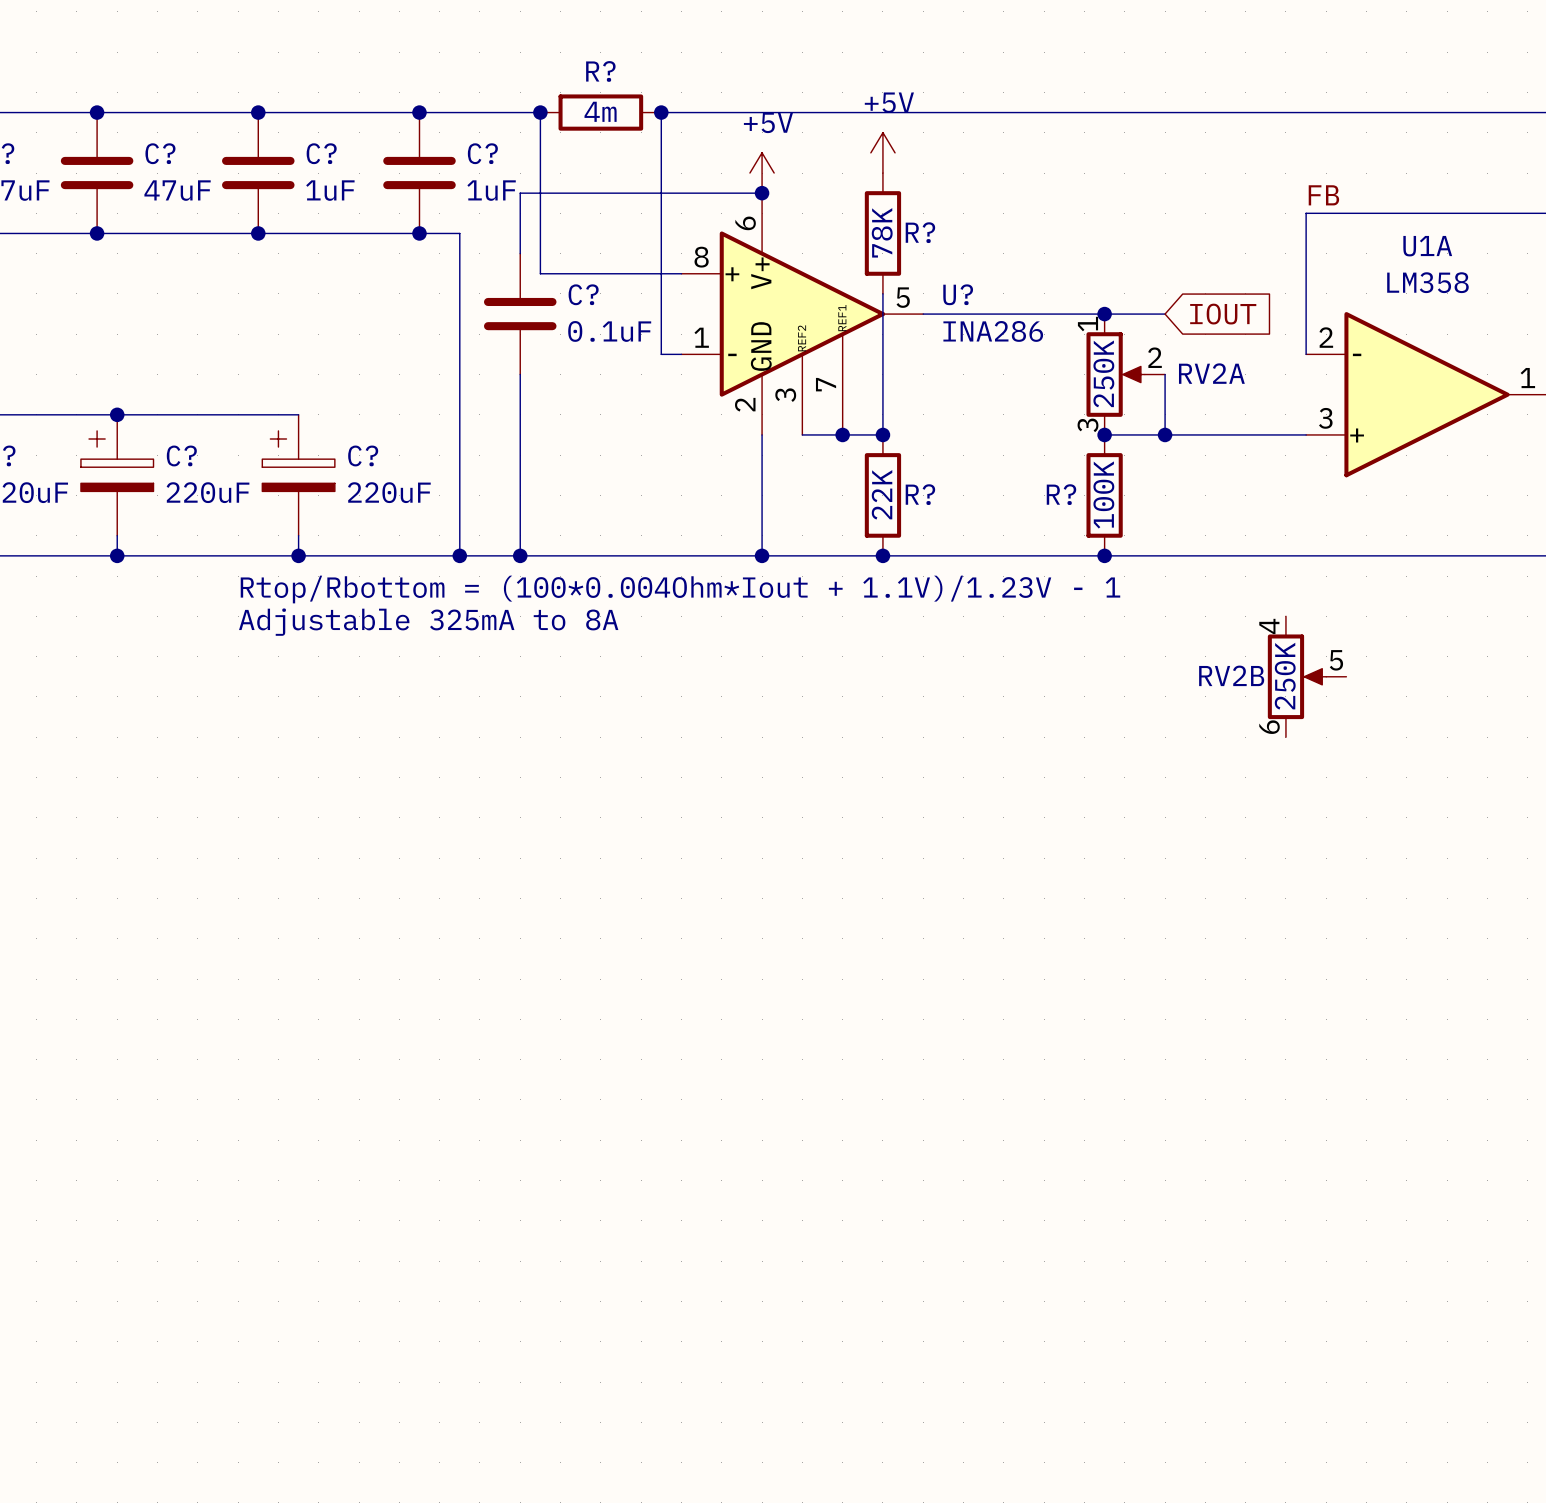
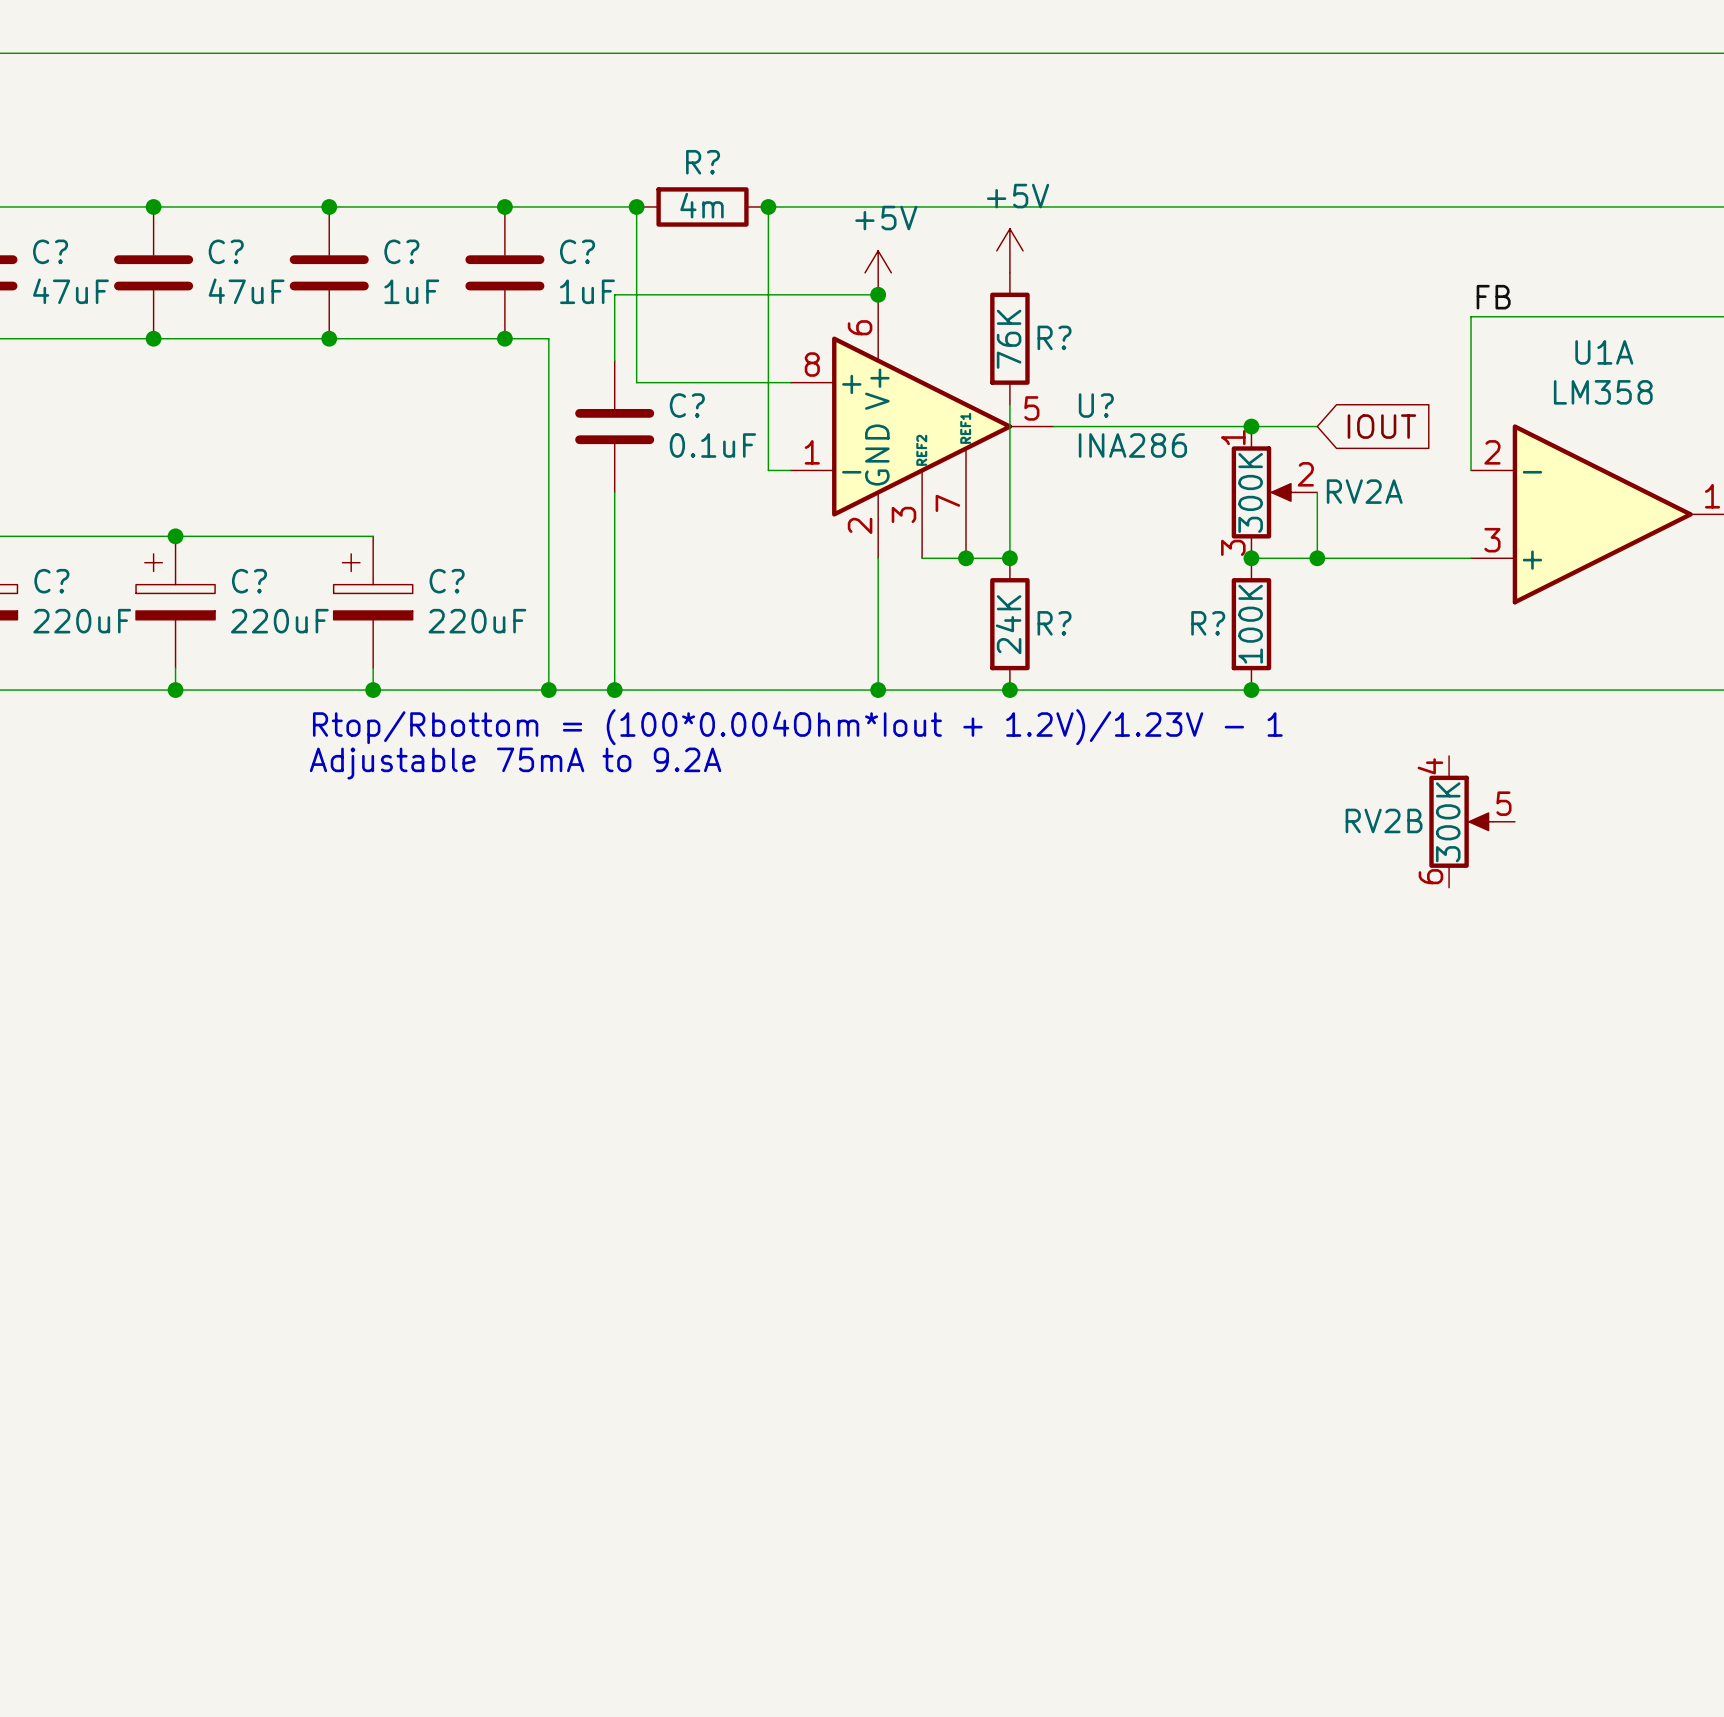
R? value: 78K (882, 232) -> 76K (1009, 339)
RV2A value: 250K (1103, 373) -> 300K (1250, 492)
R? value: 22K (882, 494) -> 24K (1008, 624)
text: Rtop/Rbottom = (100*0.004Ohm*Iout + 1.1V)/1.23V - 1 (680, 589) -> Rtop/Rbottom = (100*0.004Ohm*Iout + 1.2V)/1.23V - 1 (797, 727)
text: Adjustable 325mA to 8A (428, 622) -> Adjustable 75mA to 9.2A (515, 763)
RV2B value: 250K (1285, 676) -> 300K (1448, 822)

